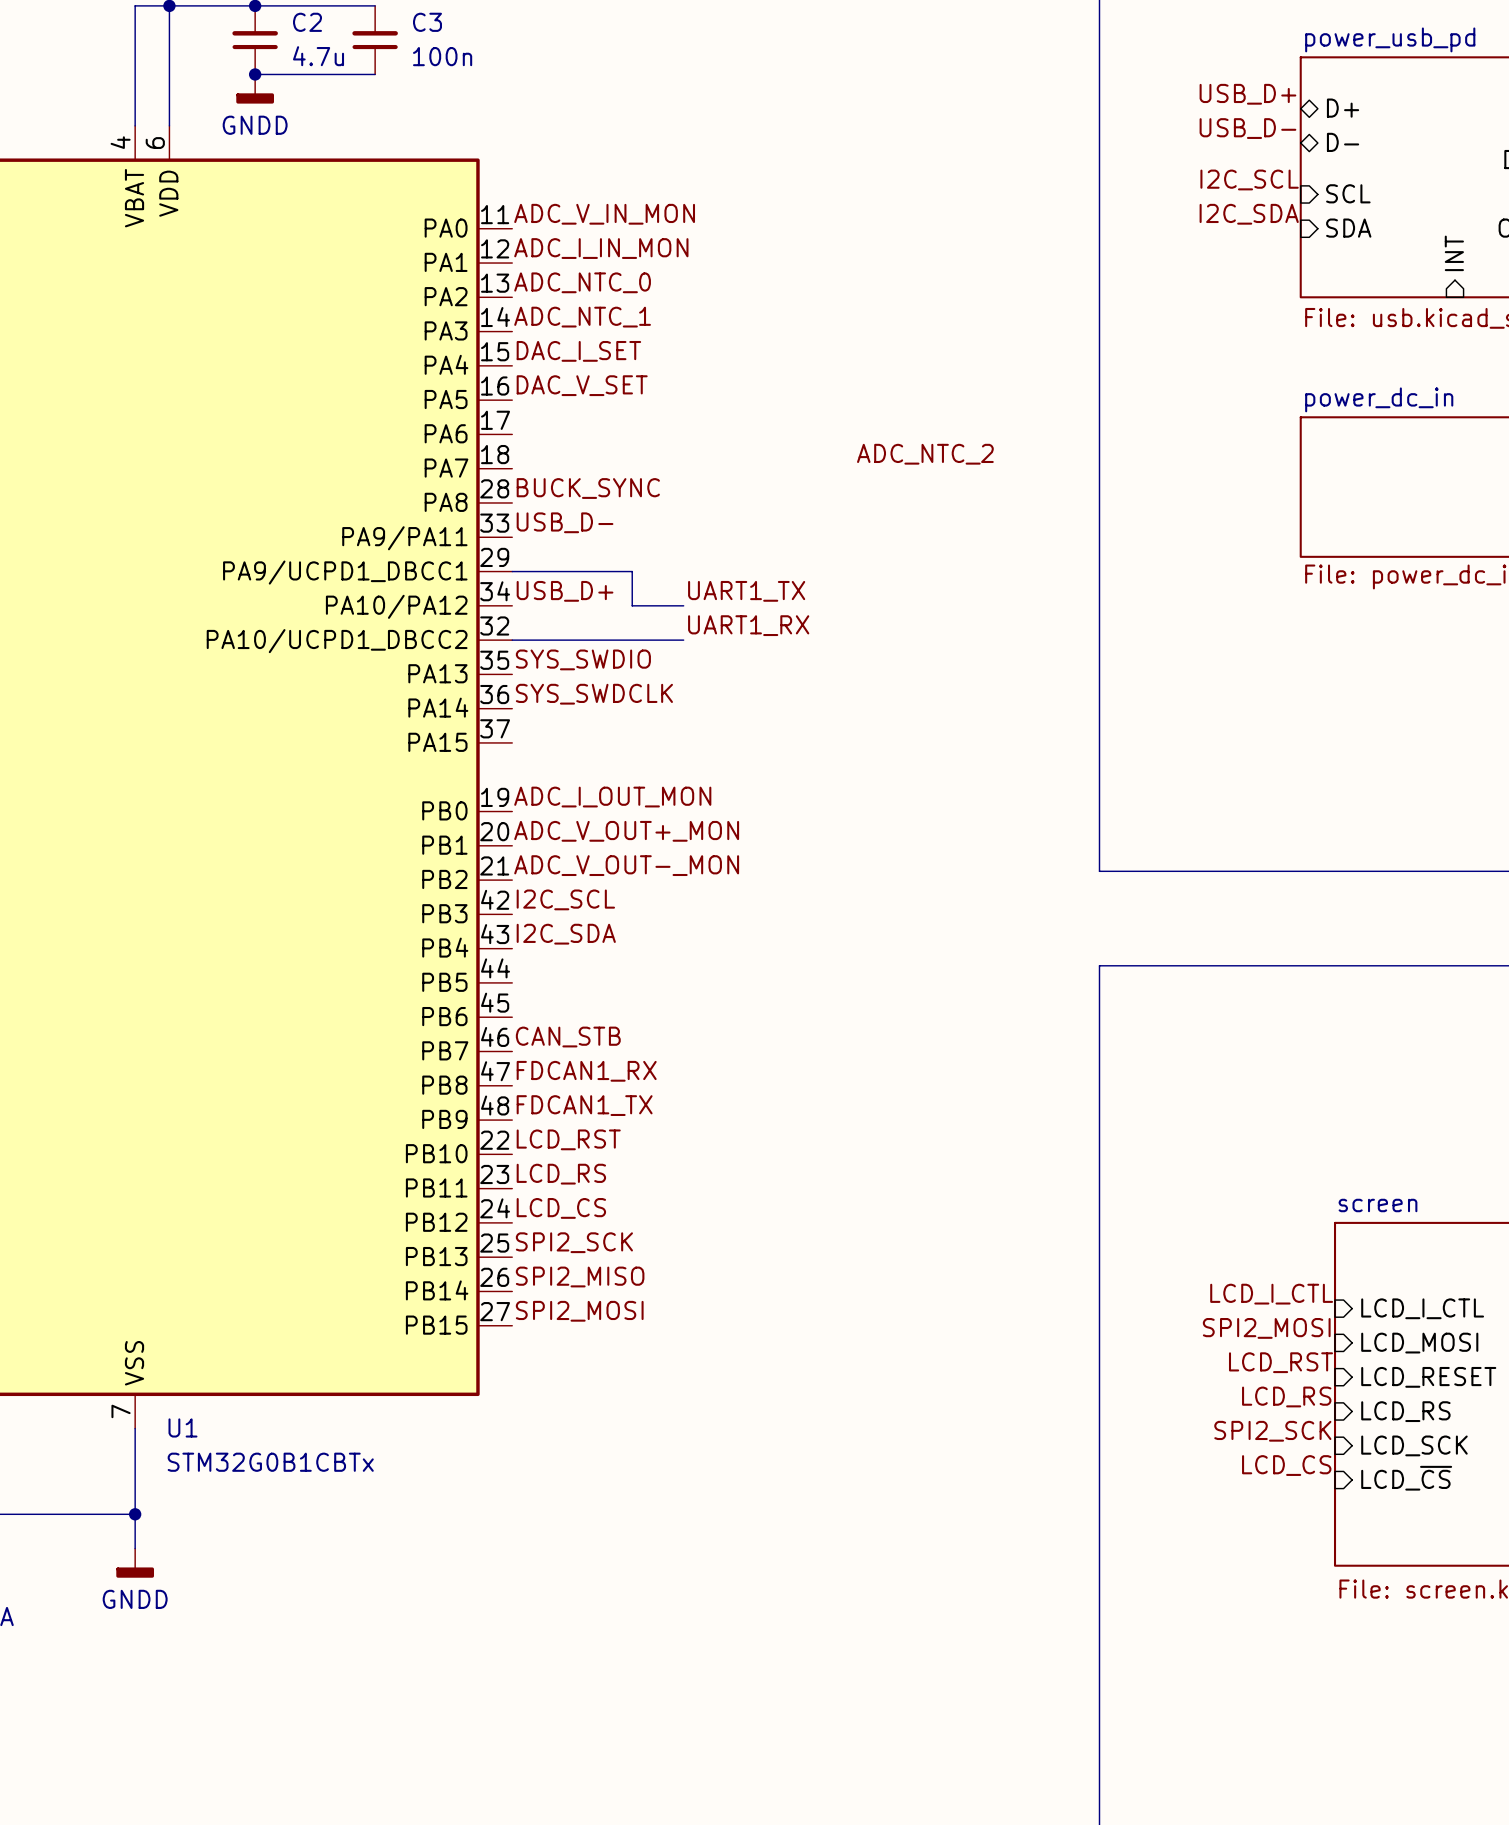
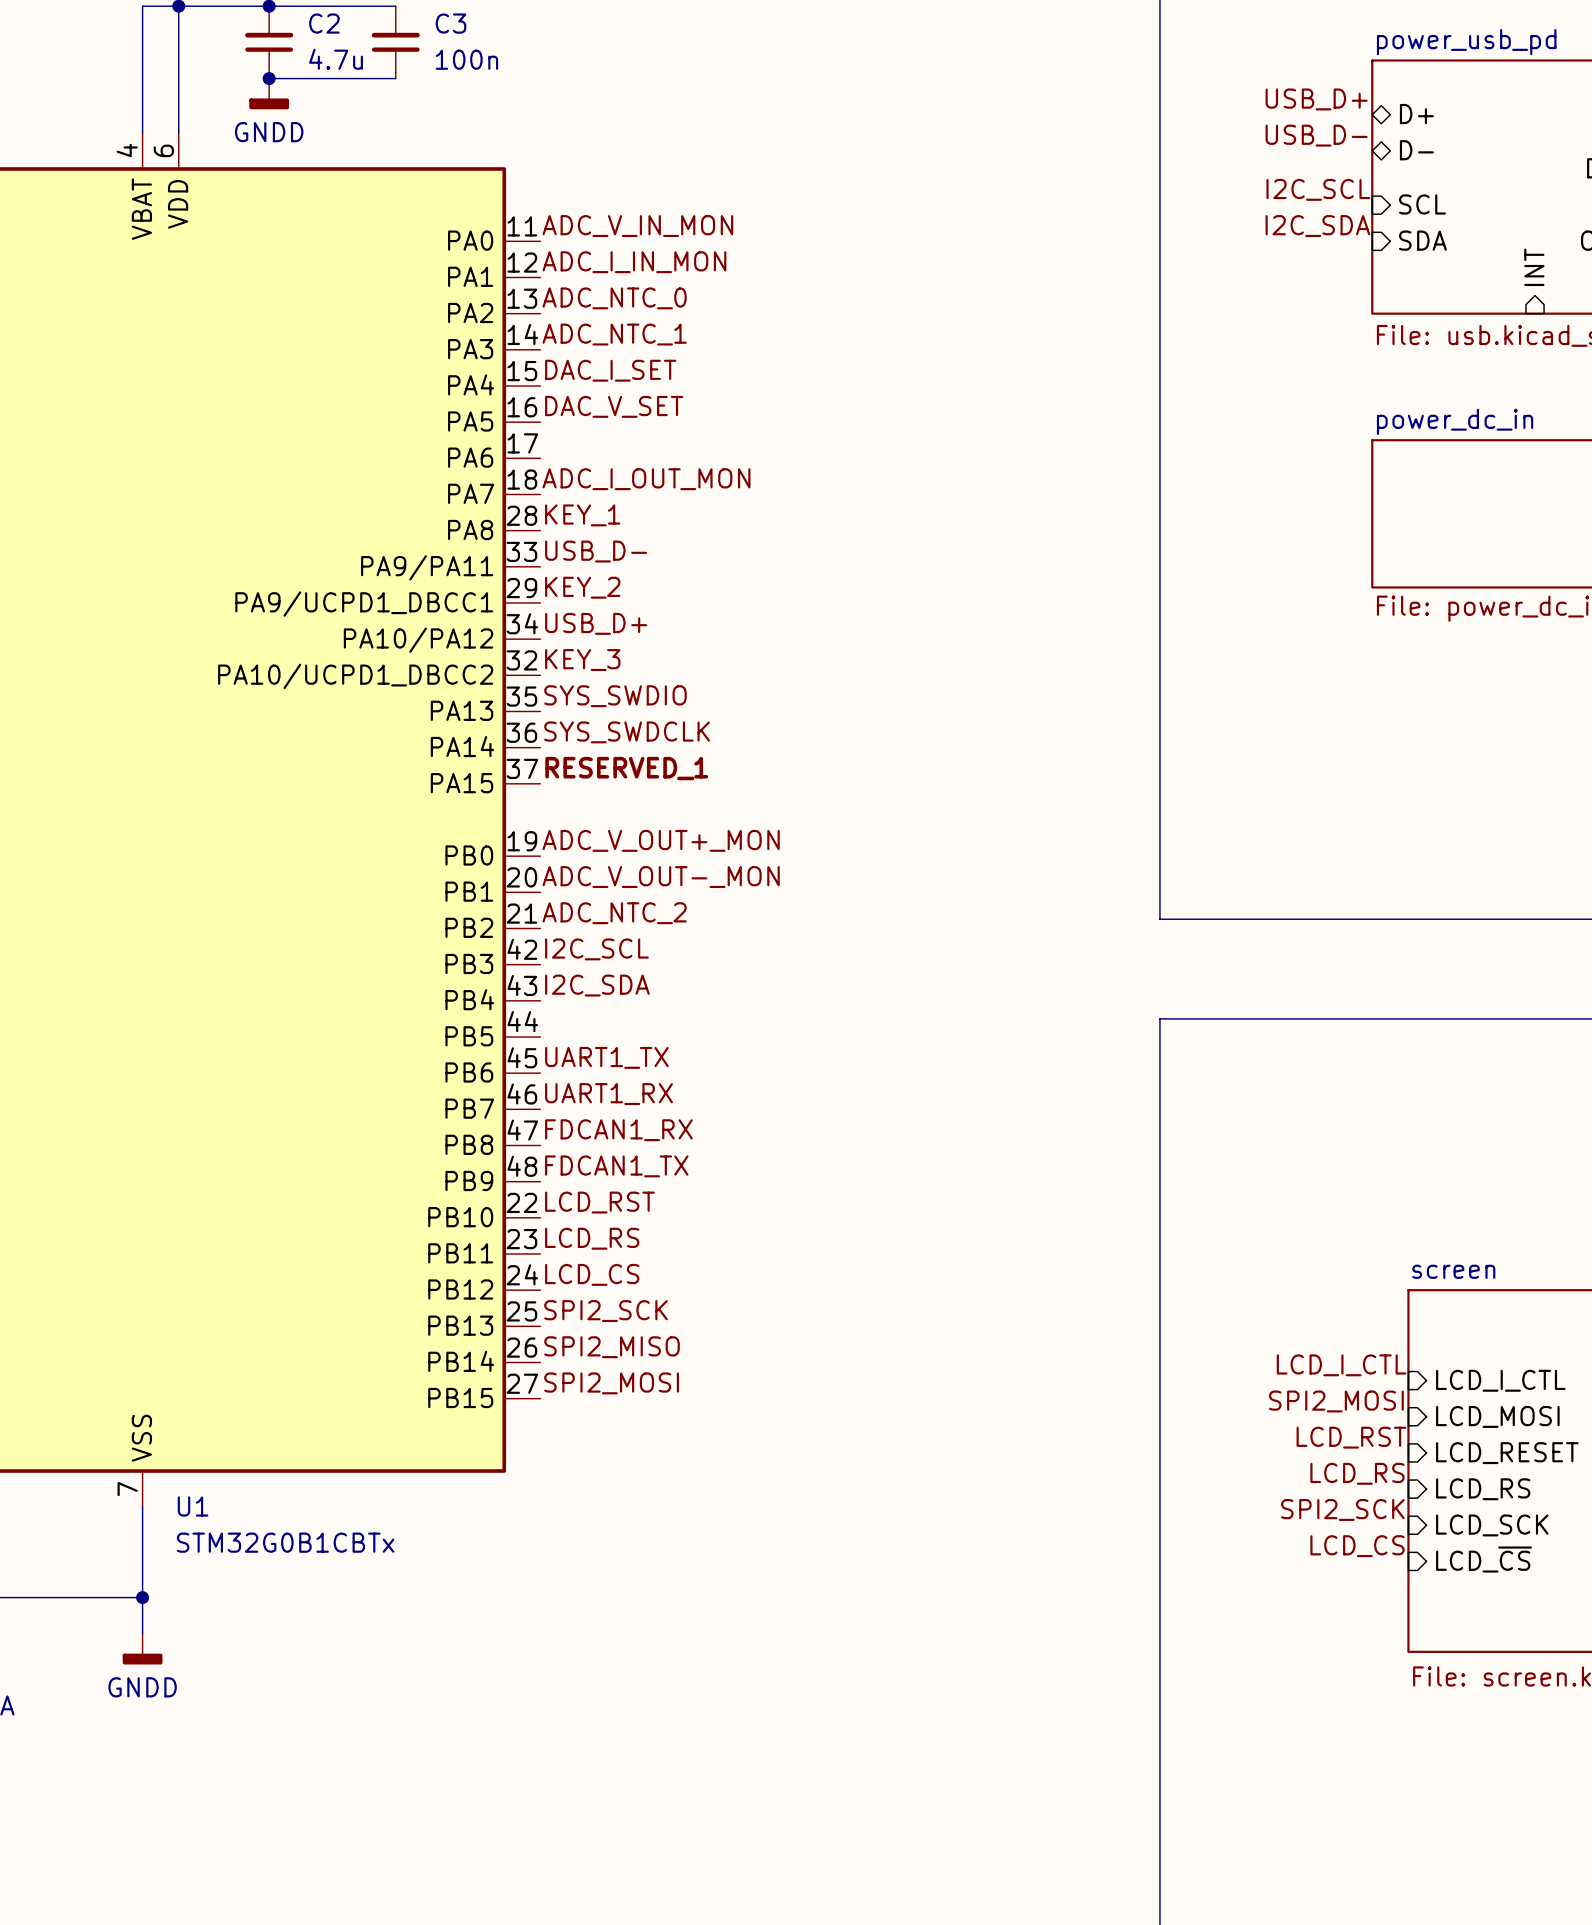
label: none -> ADC_I_OUT_MON (646, 479)
label: ADC_NTC_2 (925, 454) -> none
label: BUCK_SYNC (588, 488) -> KEY_1 (582, 515)
label: none -> KEY_2 (582, 587)
wire: (512, 571) (632, 571) (632, 605) (683, 605) -> none
label: UART1_TX (746, 591) -> none
label: none -> KEY_3 (582, 660)
label: UART1_RX (748, 625) -> none
wire: (512, 640) (683, 640) -> none
label: none -> RESERVED_1 (626, 768)
label: ADC_I_OUT_MON (612, 797) -> ADC_V_OUT+_MON (661, 840)
label: ADC_V_OUT+_MON (626, 831) -> ADC_V_OUT-_MON (661, 877)
label: ADC_V_OUT-_MON (626, 865) -> ADC_NTC_2 (614, 913)
label: none -> UART1_TX (606, 1057)
label: CAN_STB (568, 1037) -> UART1_RX (609, 1094)

